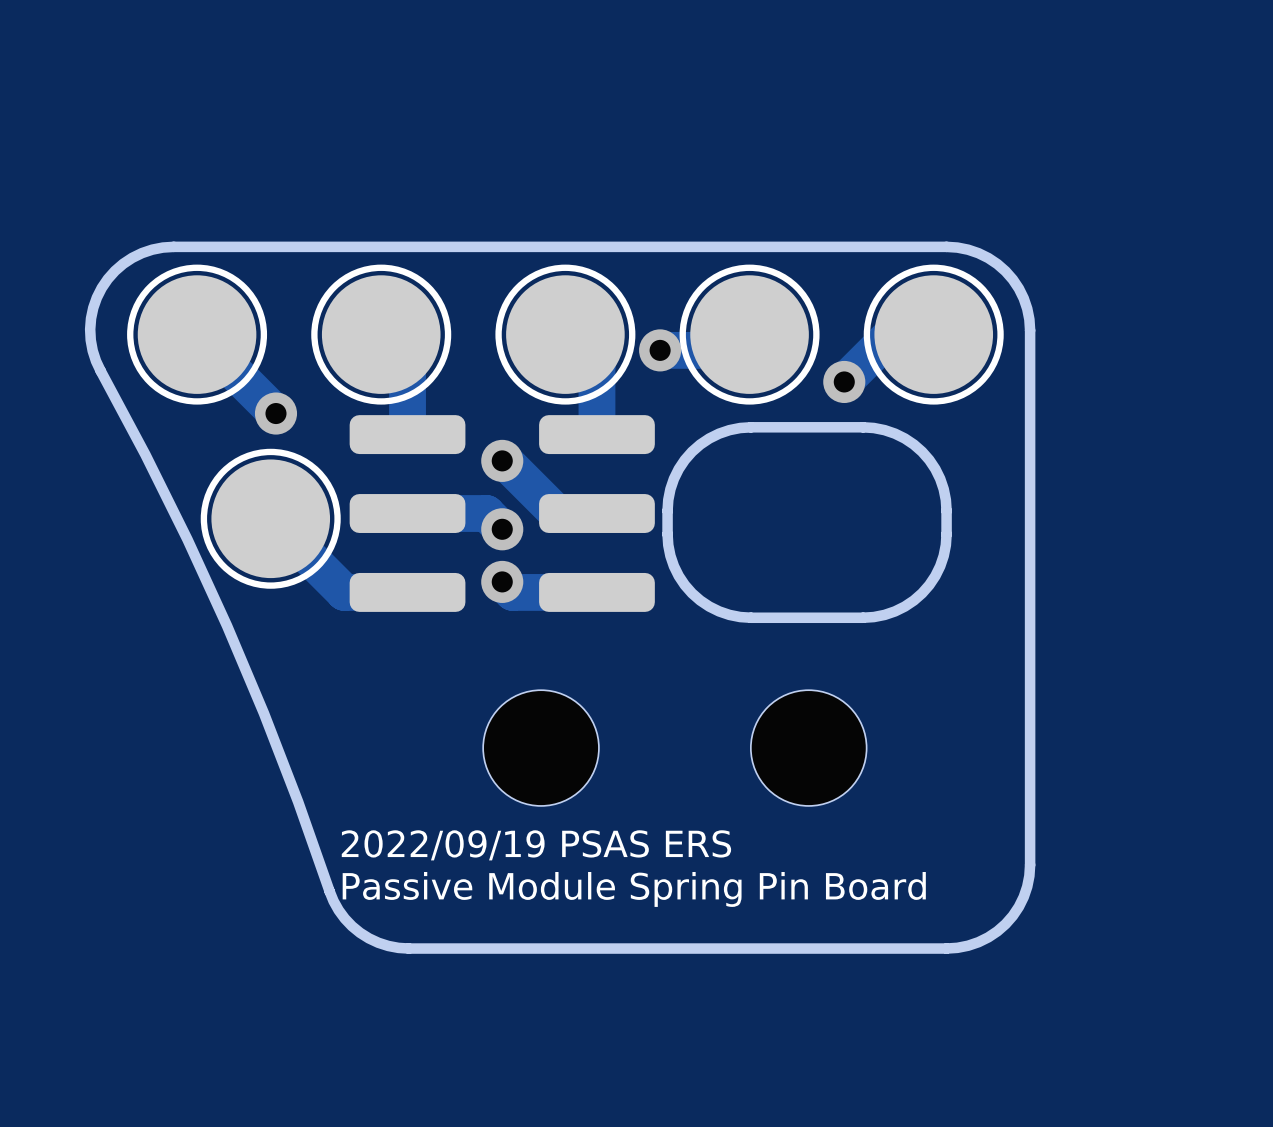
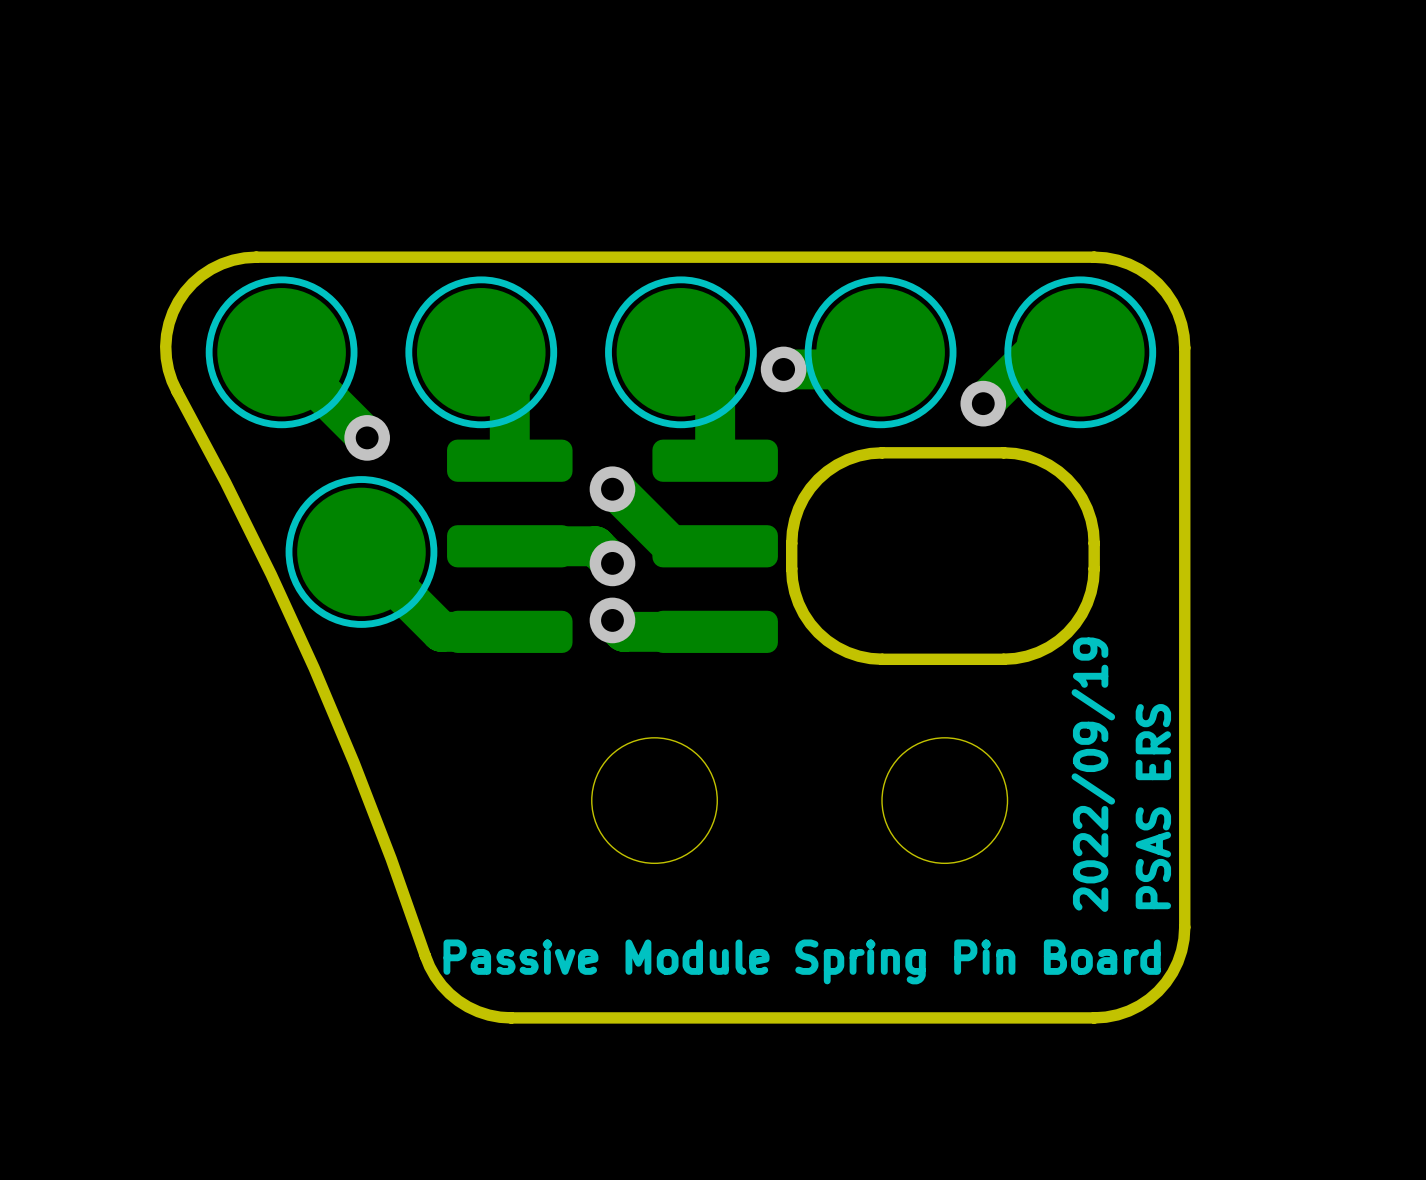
text: none -> 2022/09/19 (1093, 774)
text: none -> PSAS ERS (1153, 806)
text: 2022/09/19 PSAS ERS (536, 845) -> none
text position: Passive Module Spring Pin Board (634, 889) -> Passive Module Spring Pin Board (802, 961)

